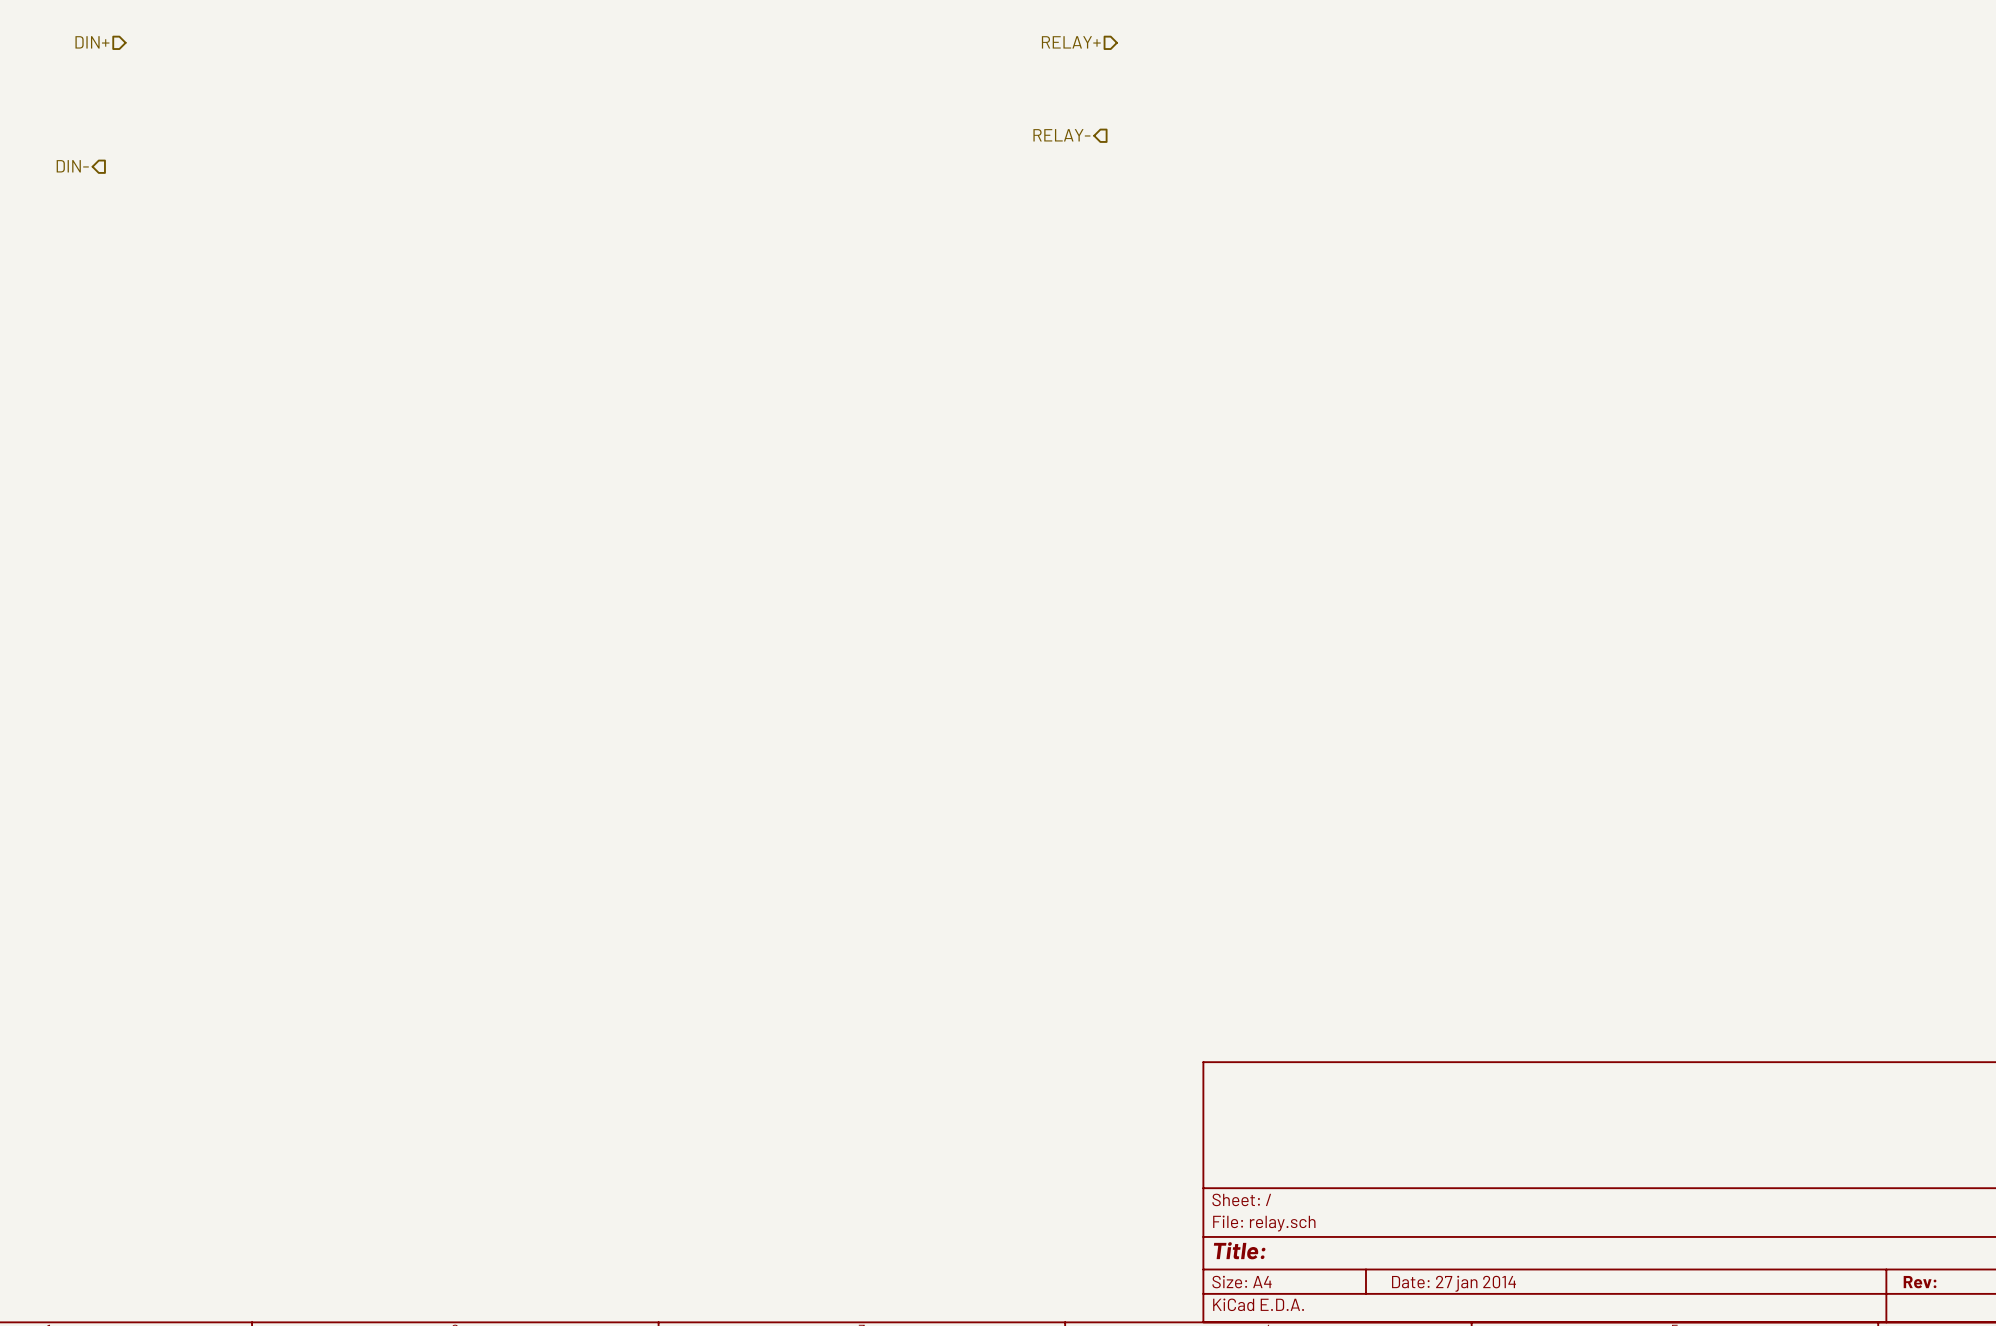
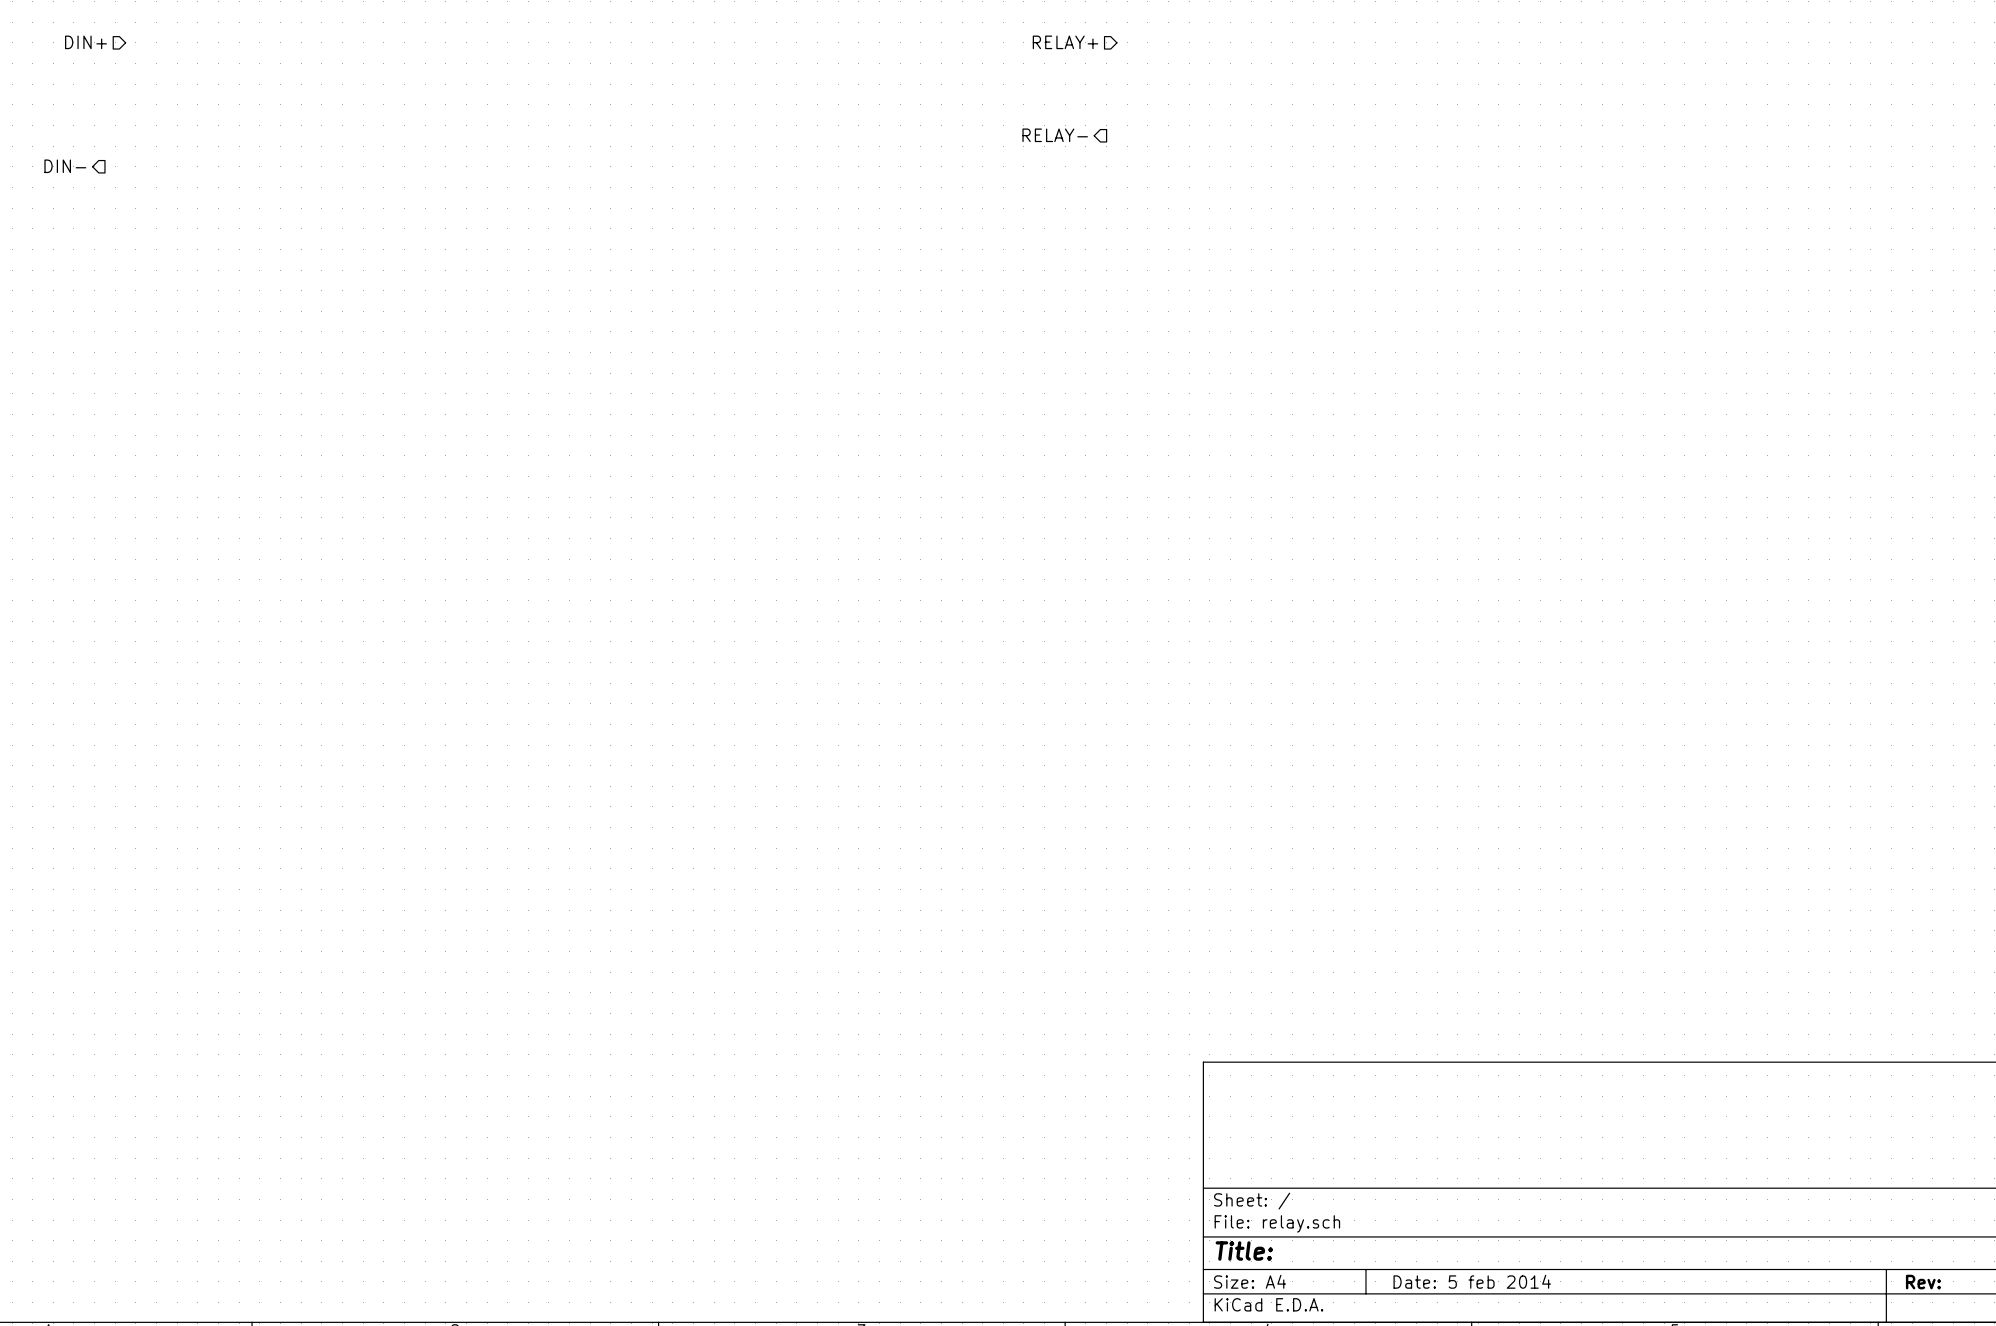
title block: Date: 27 jan 2014 (1454, 1283) -> Date: 5 feb 2014 (1472, 1281)

